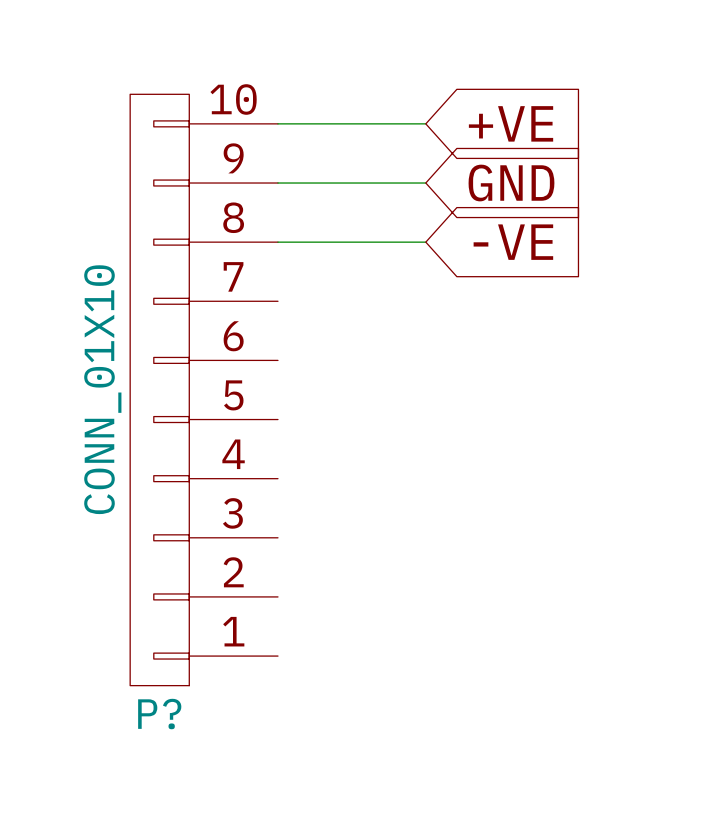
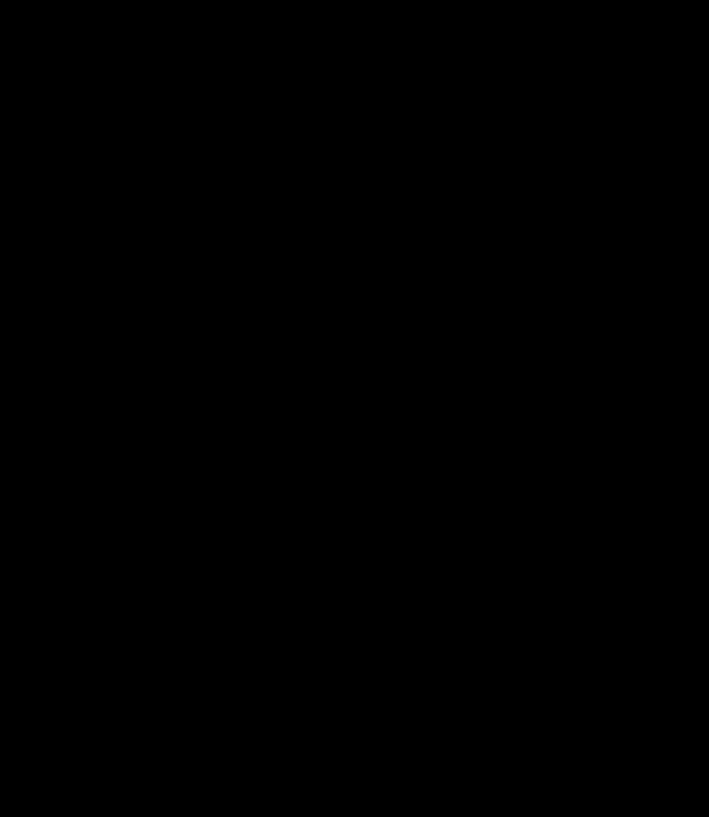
wire: (277, 123) (425, 123) -> none
global label: +VE (511, 123) -> none
wire: (277, 183) (425, 183) -> none
global label: GND (511, 183) -> none
wire: (277, 242) (425, 242) -> none
global label: -VE (513, 242) -> none
P?: CONN_01X10 (204, 389) -> none

